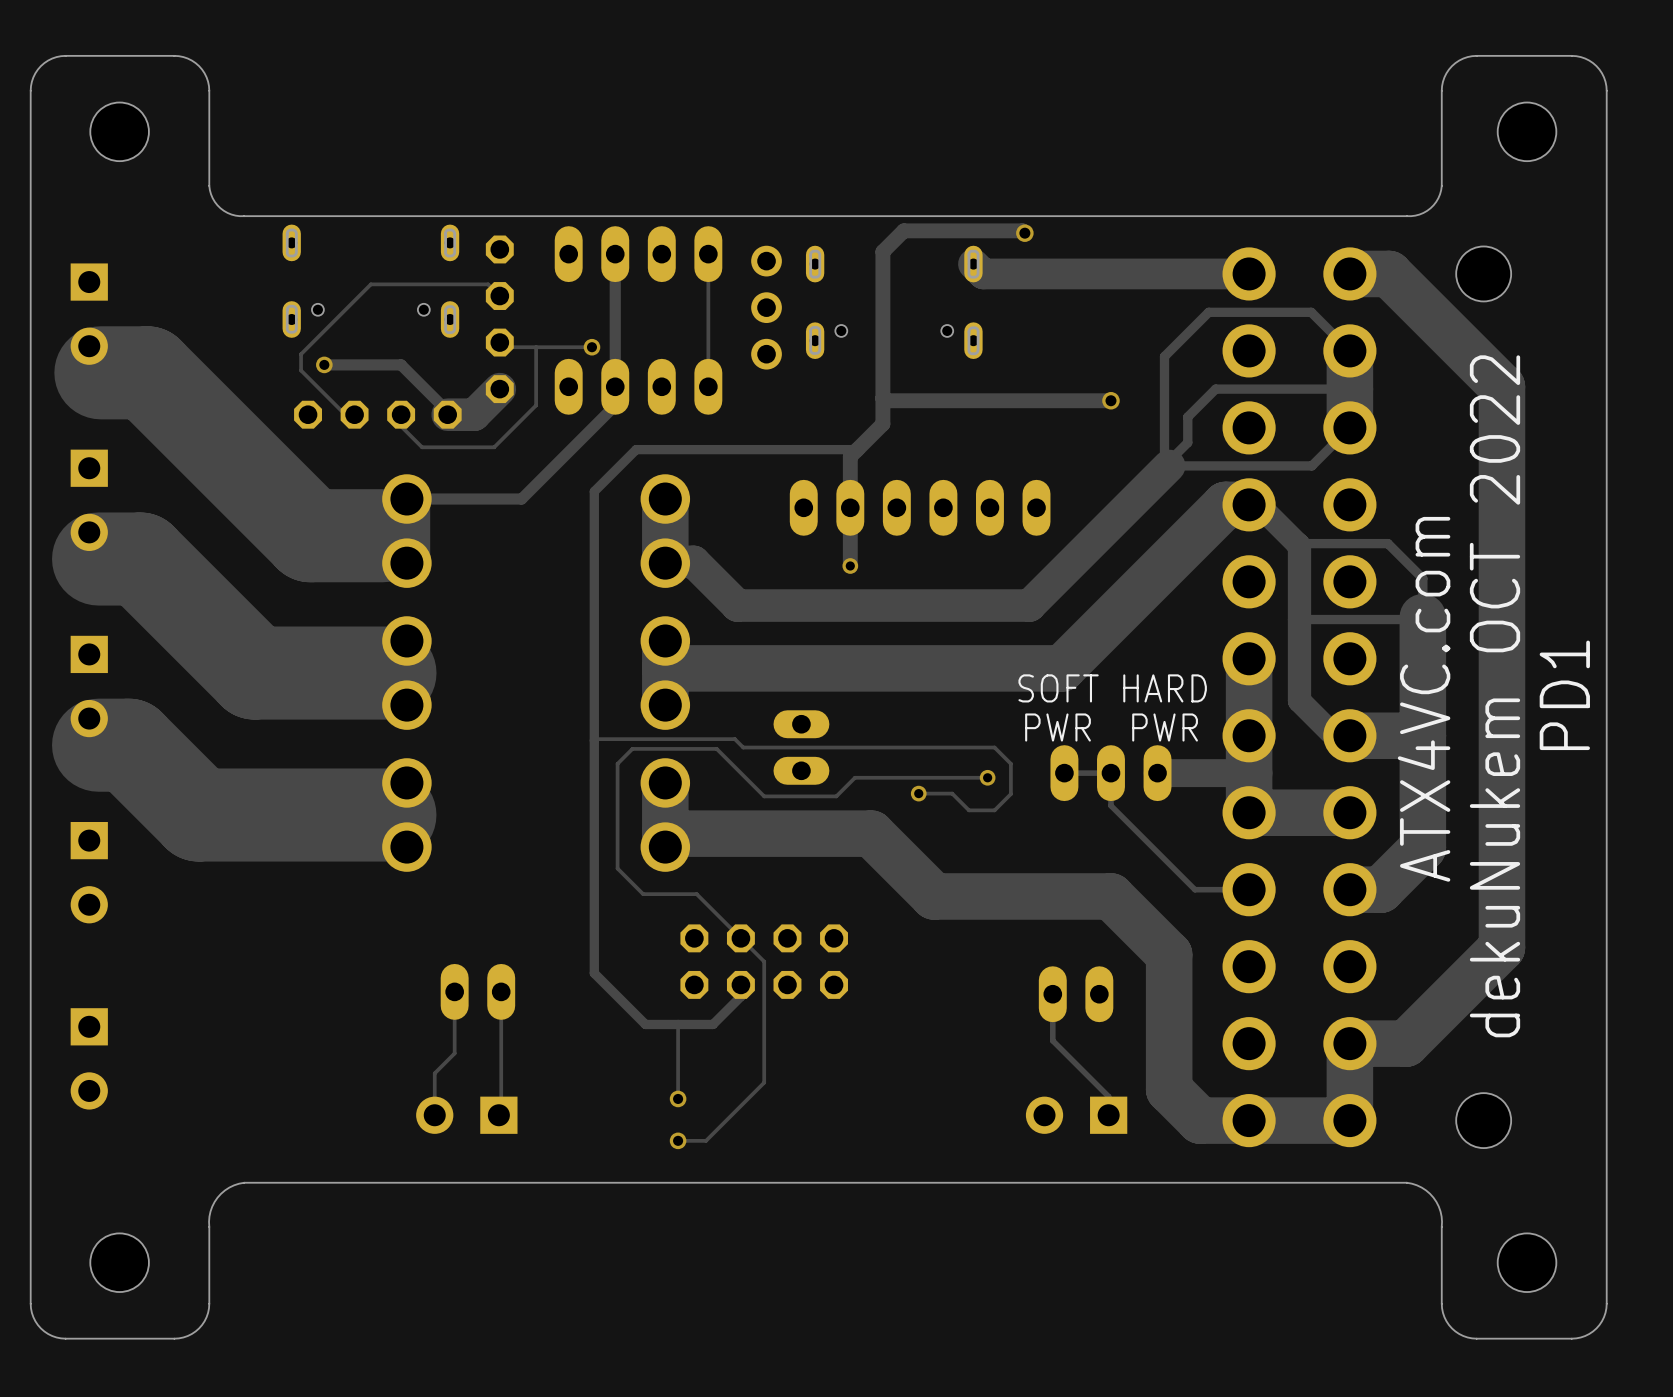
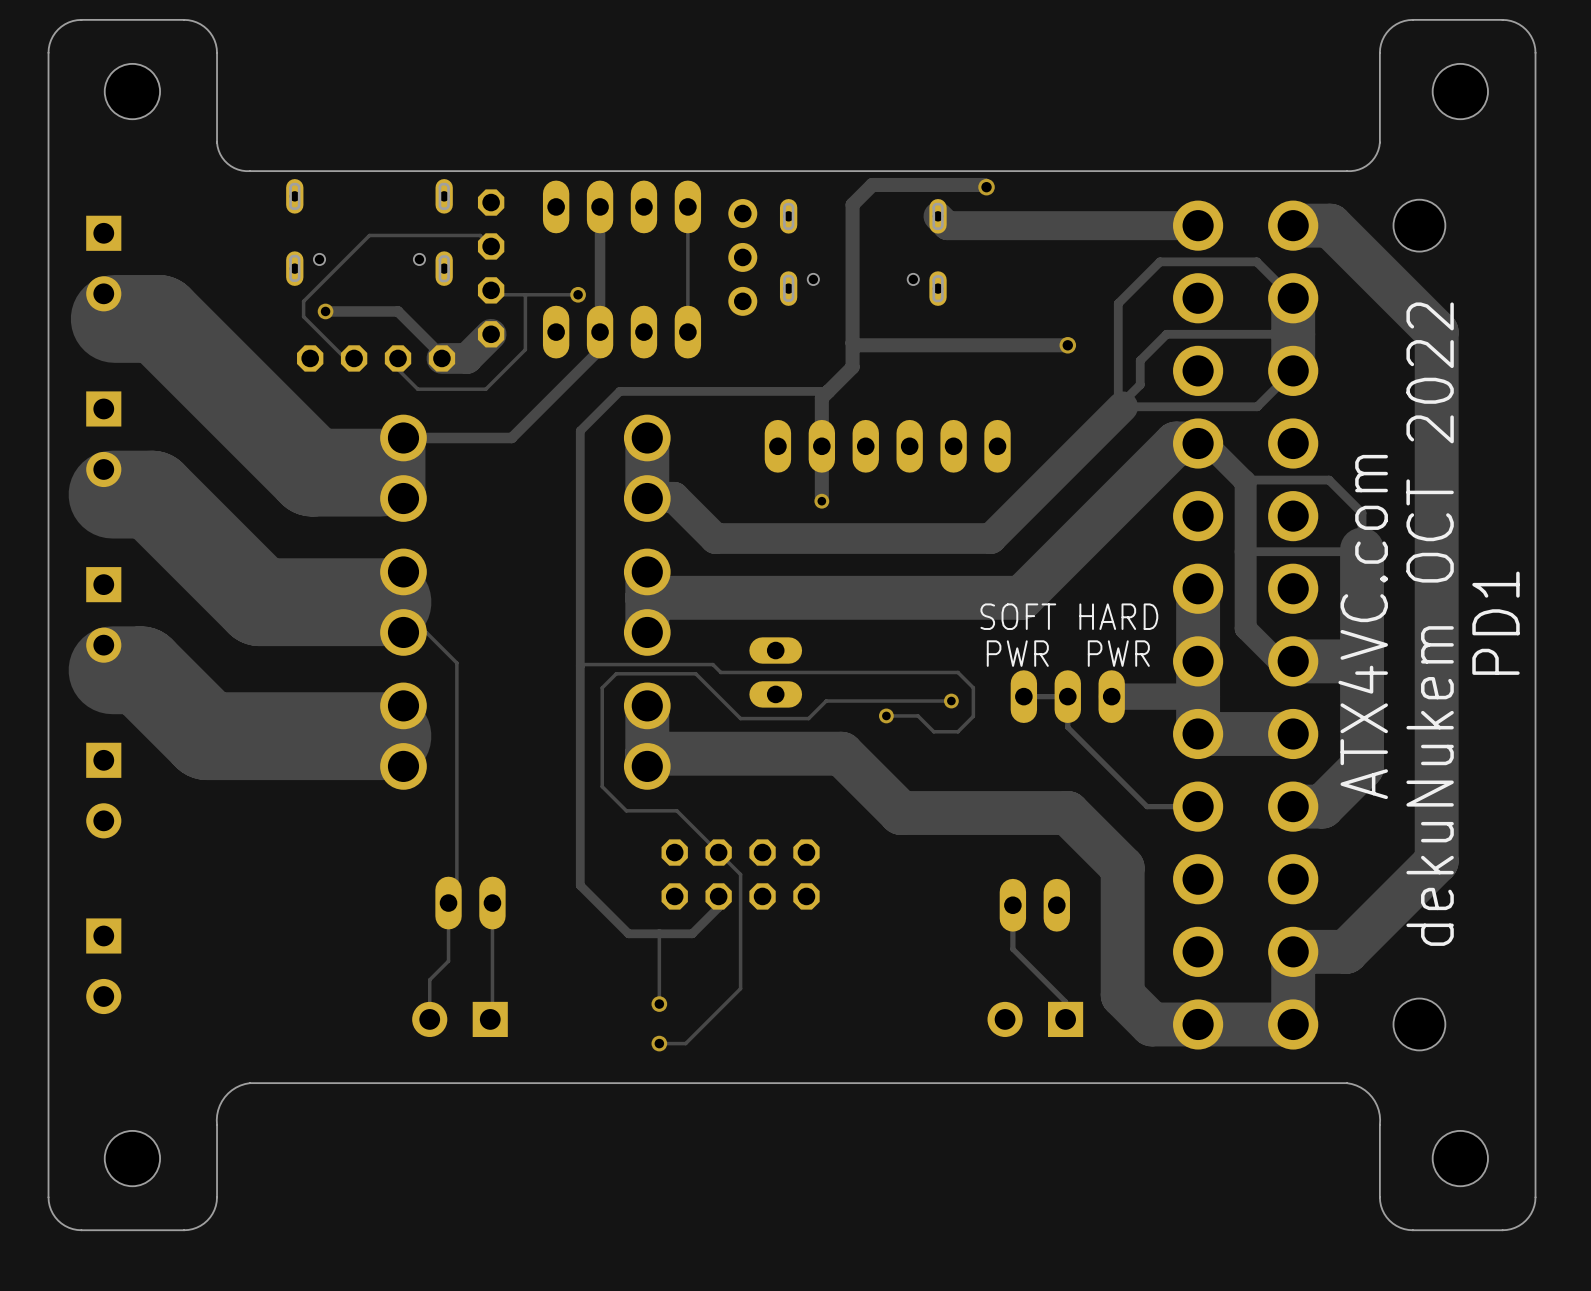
track: none -> (403, 632) (426, 632) (456, 663) (456, 894) (448, 903)

